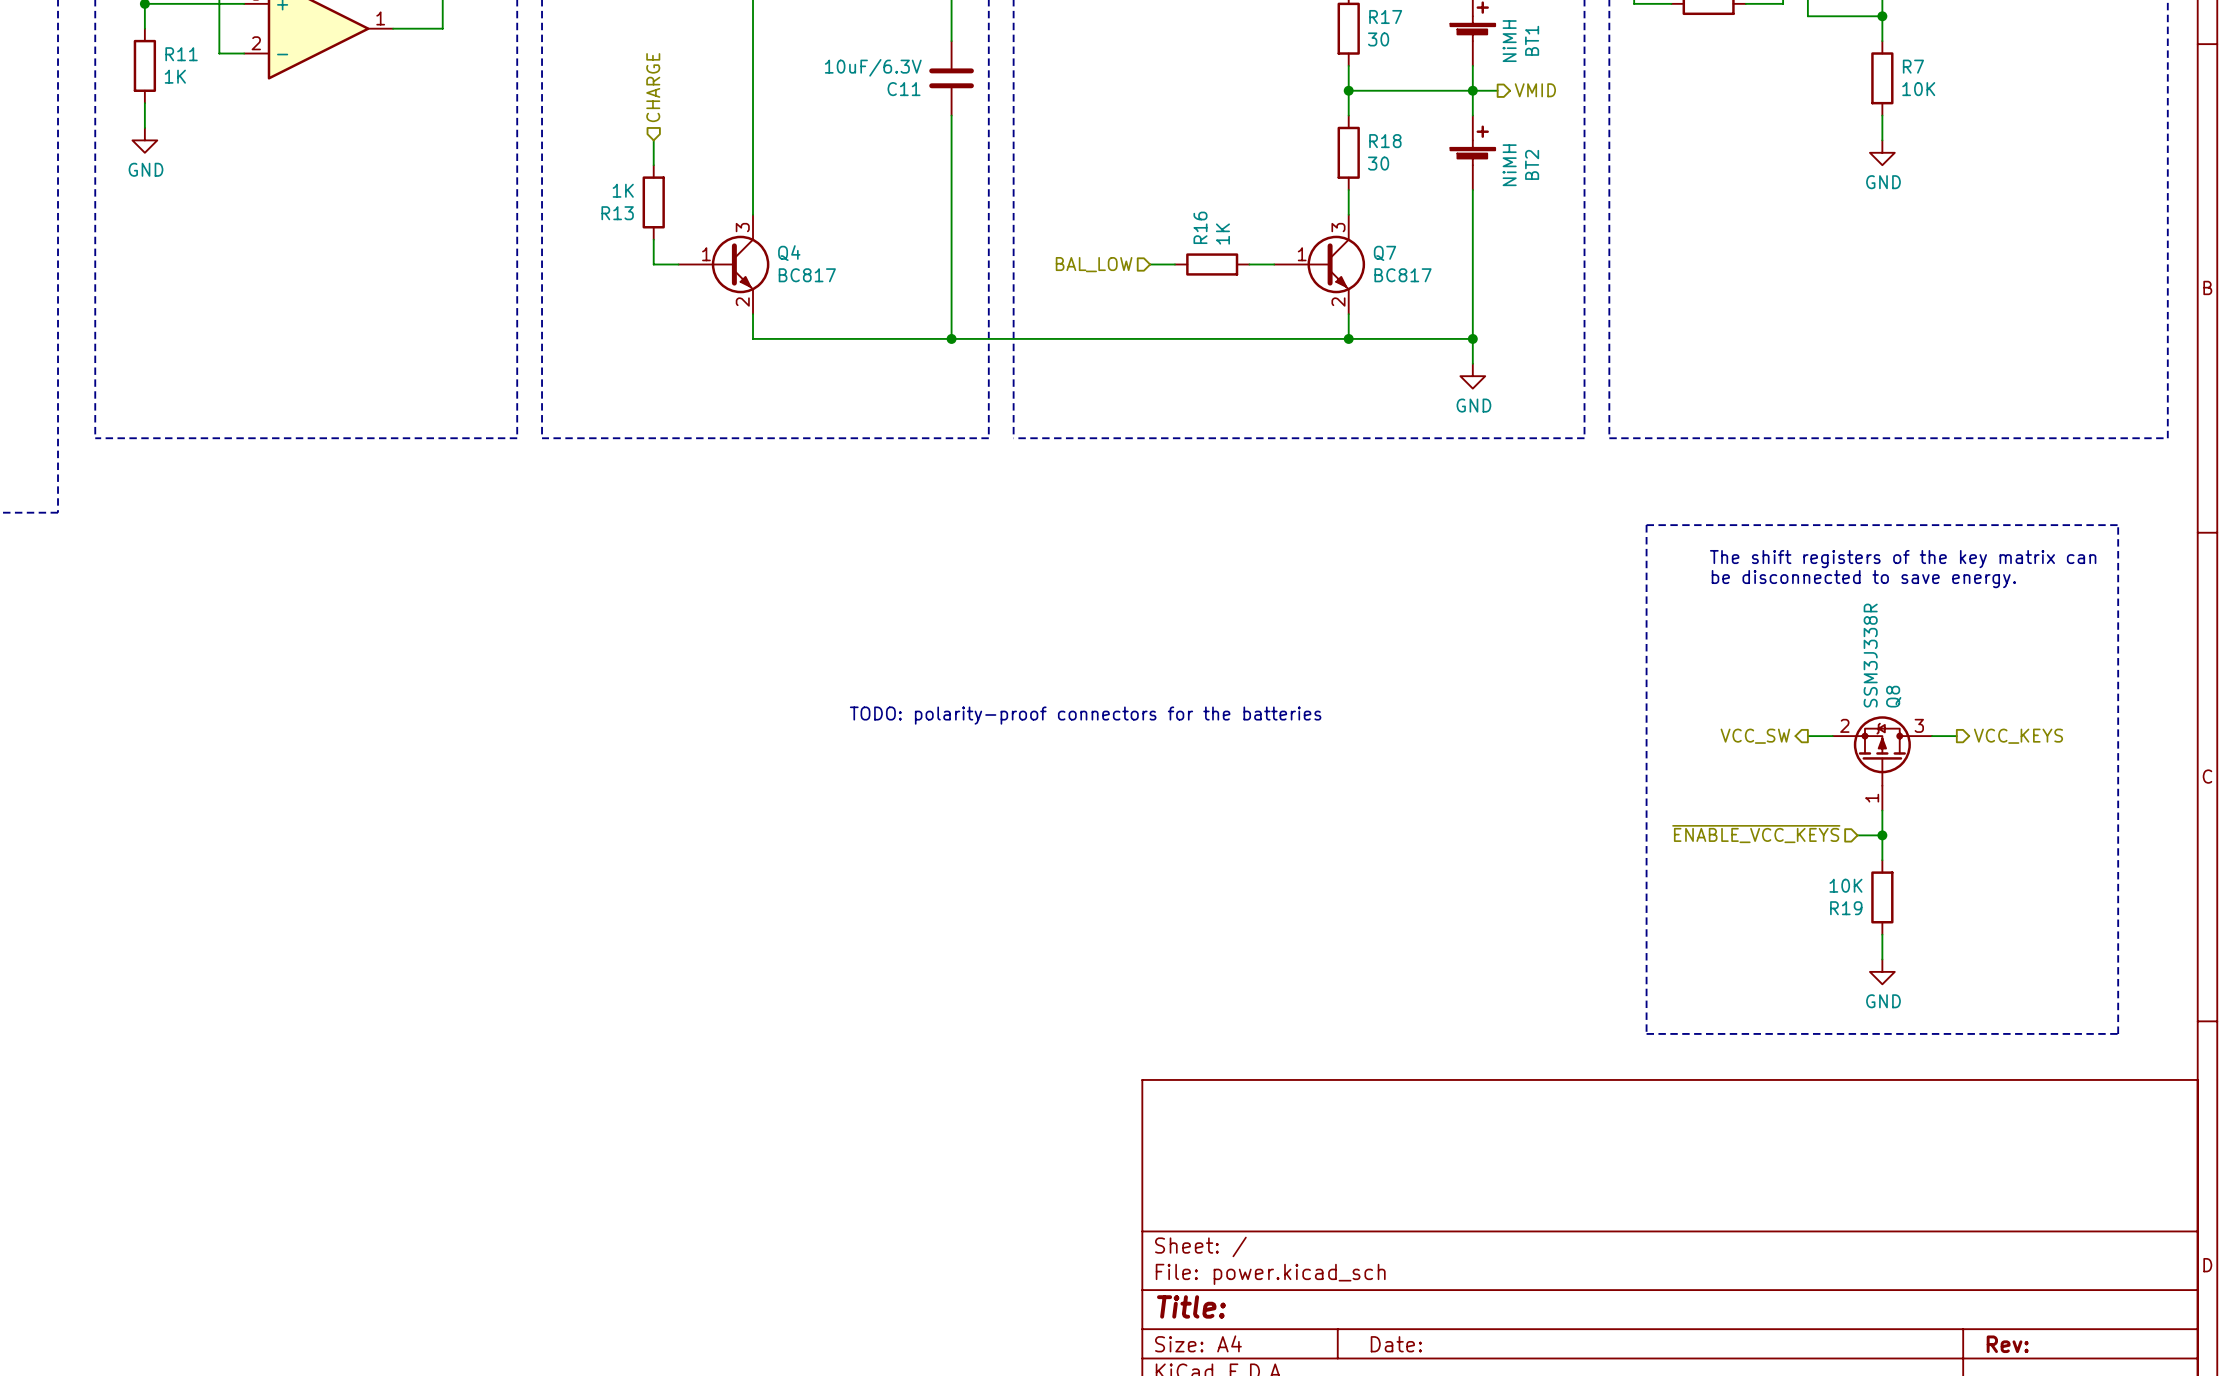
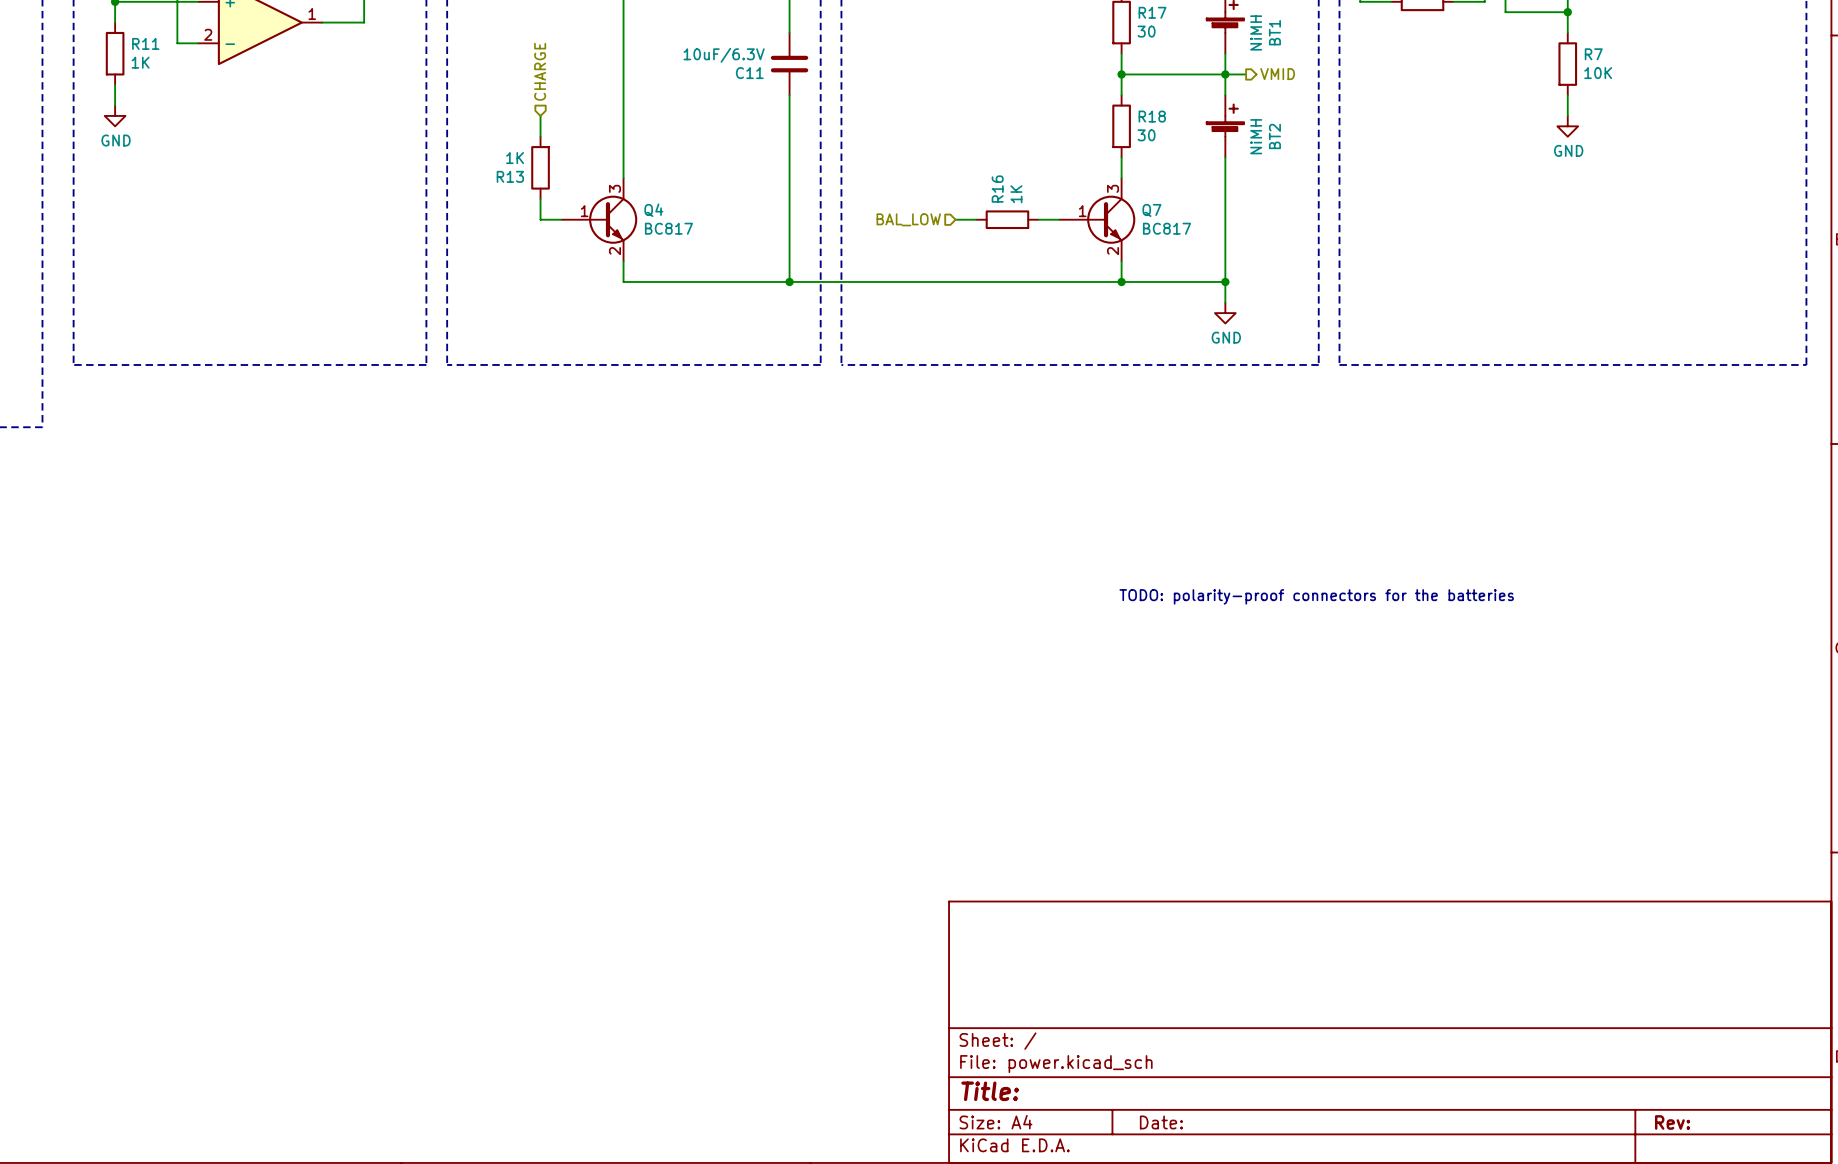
line: (1646, 525) (1646, 1033) (2118, 1033) (2118, 525) (1646, 525) -> none
text: The shift registers of the key matrix can (1903, 559) -> none
text: be disconnected to save energy. (1863, 579) -> none
text: TODO: polarity-proof connectors for the batteries (1085, 715) -> none
text: none -> TODO: polarity-proof connectors for the batteries (1316, 596)
hierarchical label: VCC_SW (1755, 736) -> none
wire: (1807, 736) (1832, 736) -> none
wire: (1932, 736) (1956, 736) -> none
hierarchical label: VCC_KEYS (2018, 736) -> none
Q8: SSM3J338R (1882, 763) -> none
wire: (1882, 810) (1882, 860) -> none
hierarchical label: ~{ENABLE_VCC_KEYS} (1756, 834) -> none
wire: (1857, 835) (1882, 835) -> none
junction: (1882, 835) -> none
R19: 10K (1882, 897) -> none
wire: (1882, 934) (1882, 959) -> none
power symbol: GND (1882, 971) -> none

